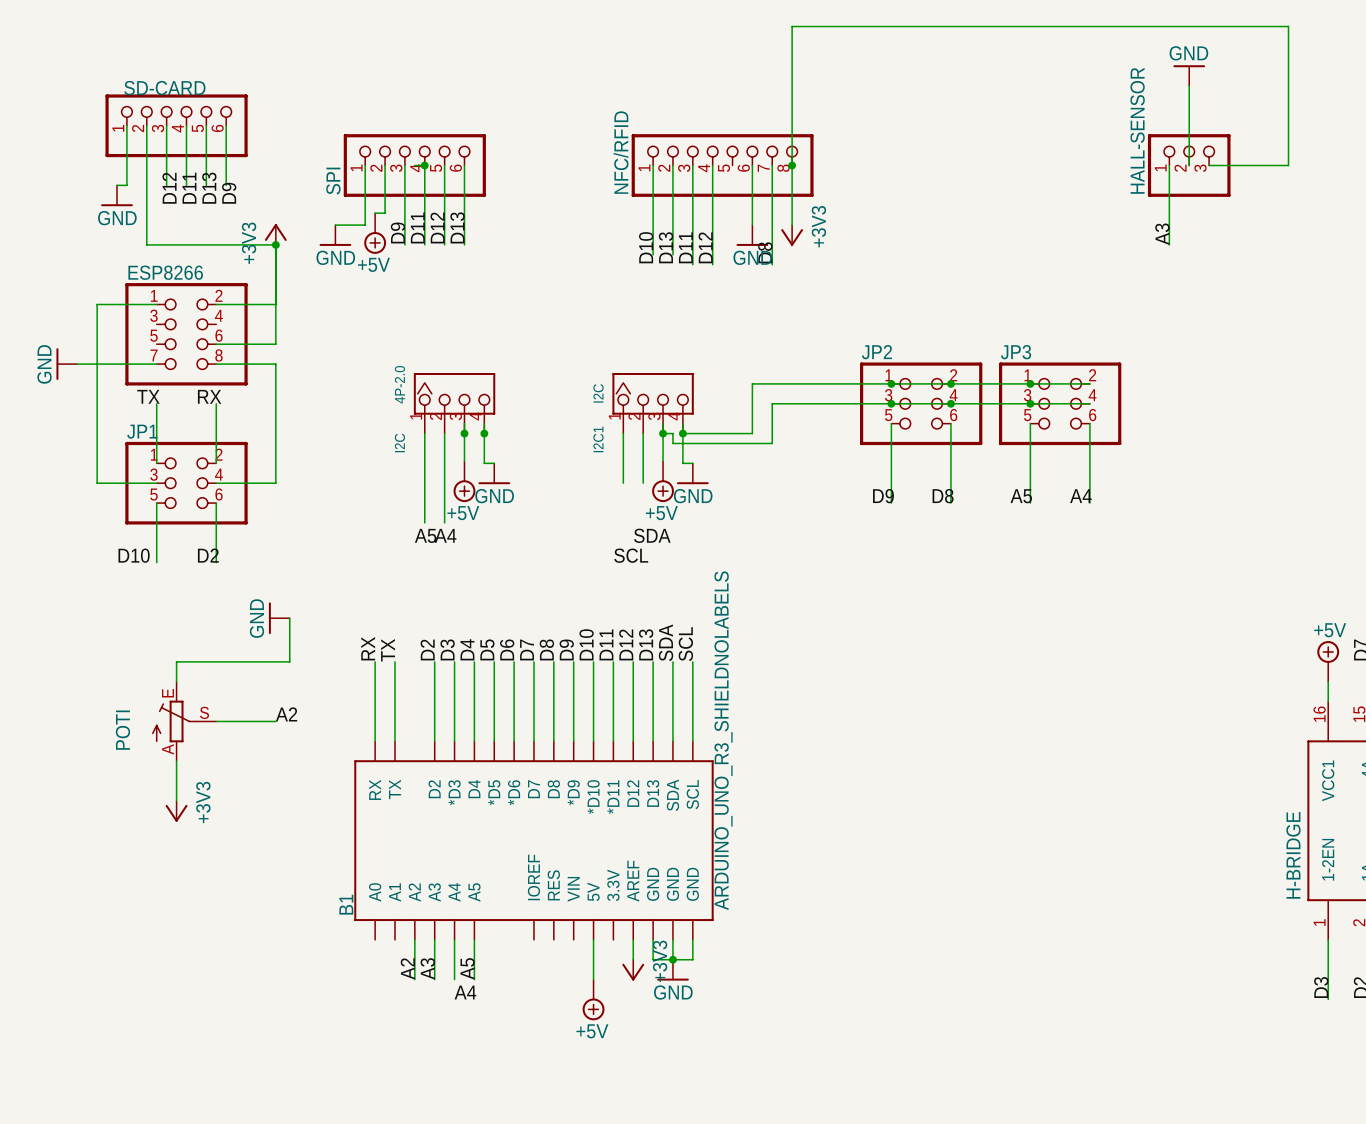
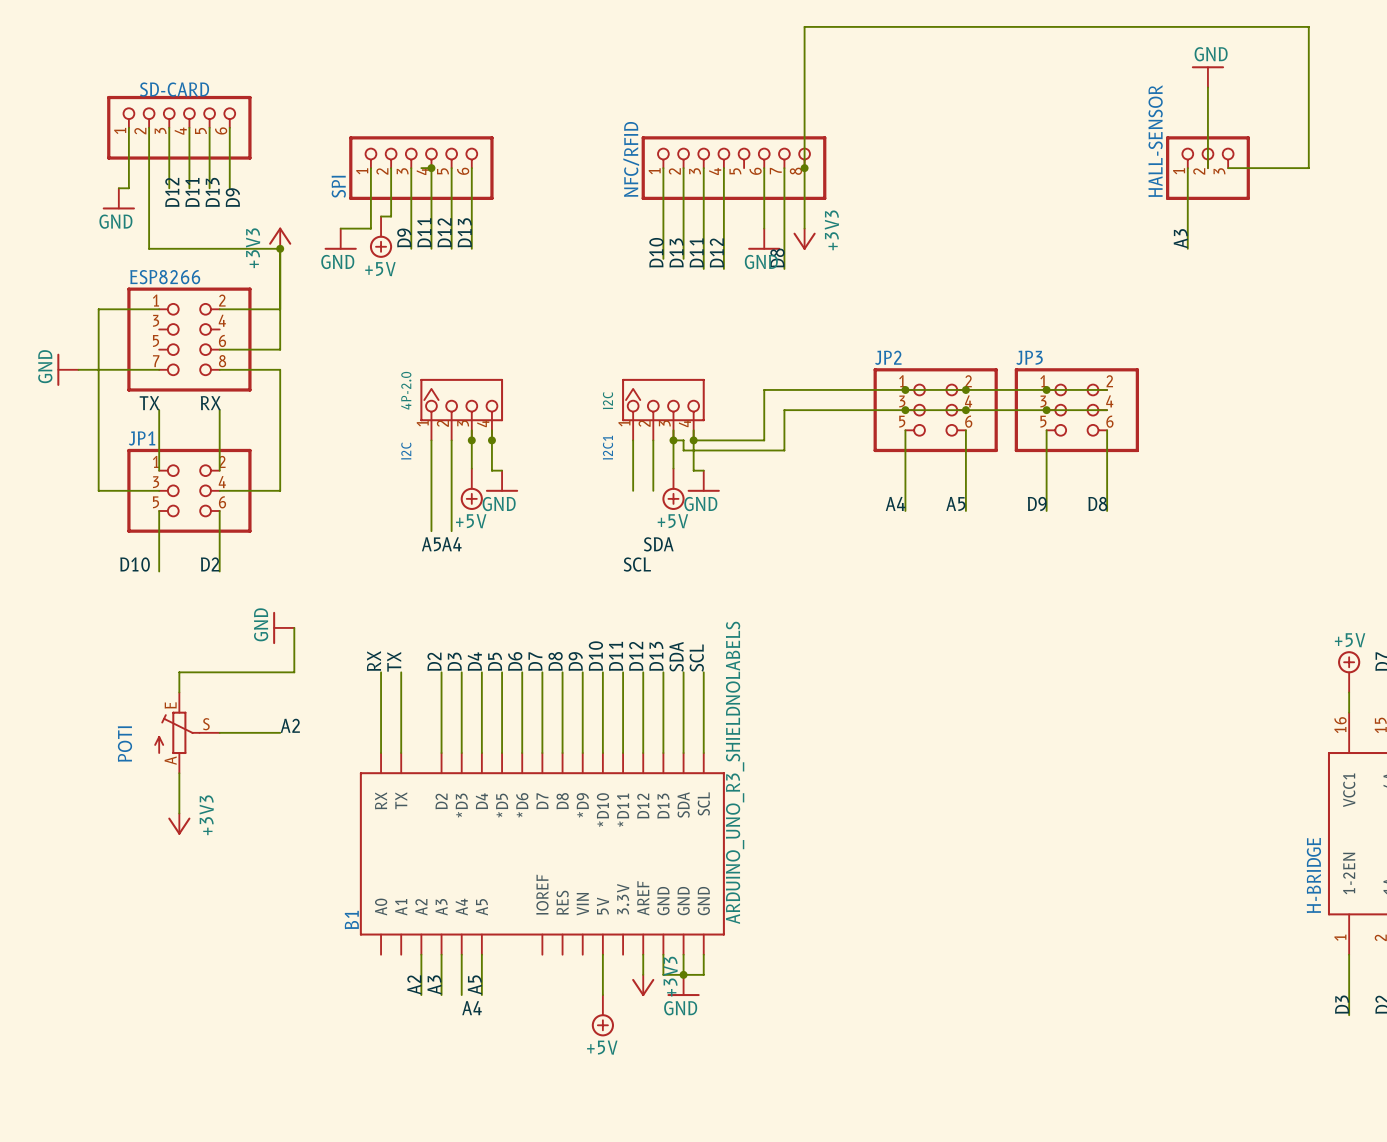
label: D9 (883, 496) -> A4 (895, 503)
label: D8 (943, 496) -> A5 (955, 503)
label: A5 (1021, 496) -> D9 (1037, 504)
label: A4 (1080, 496) -> D8 (1097, 504)

